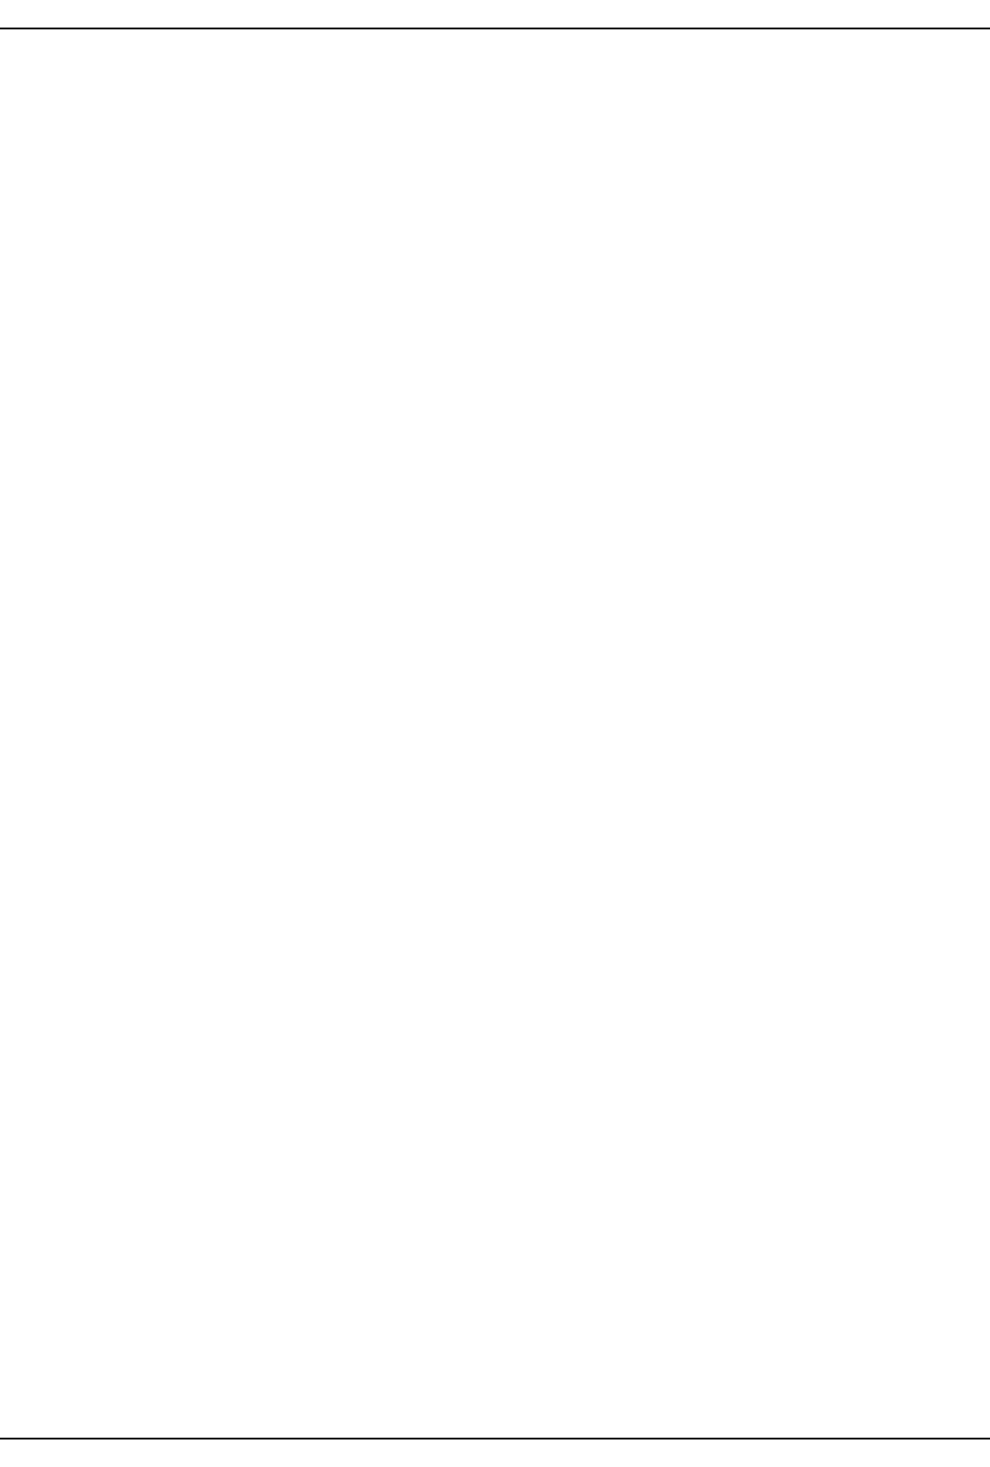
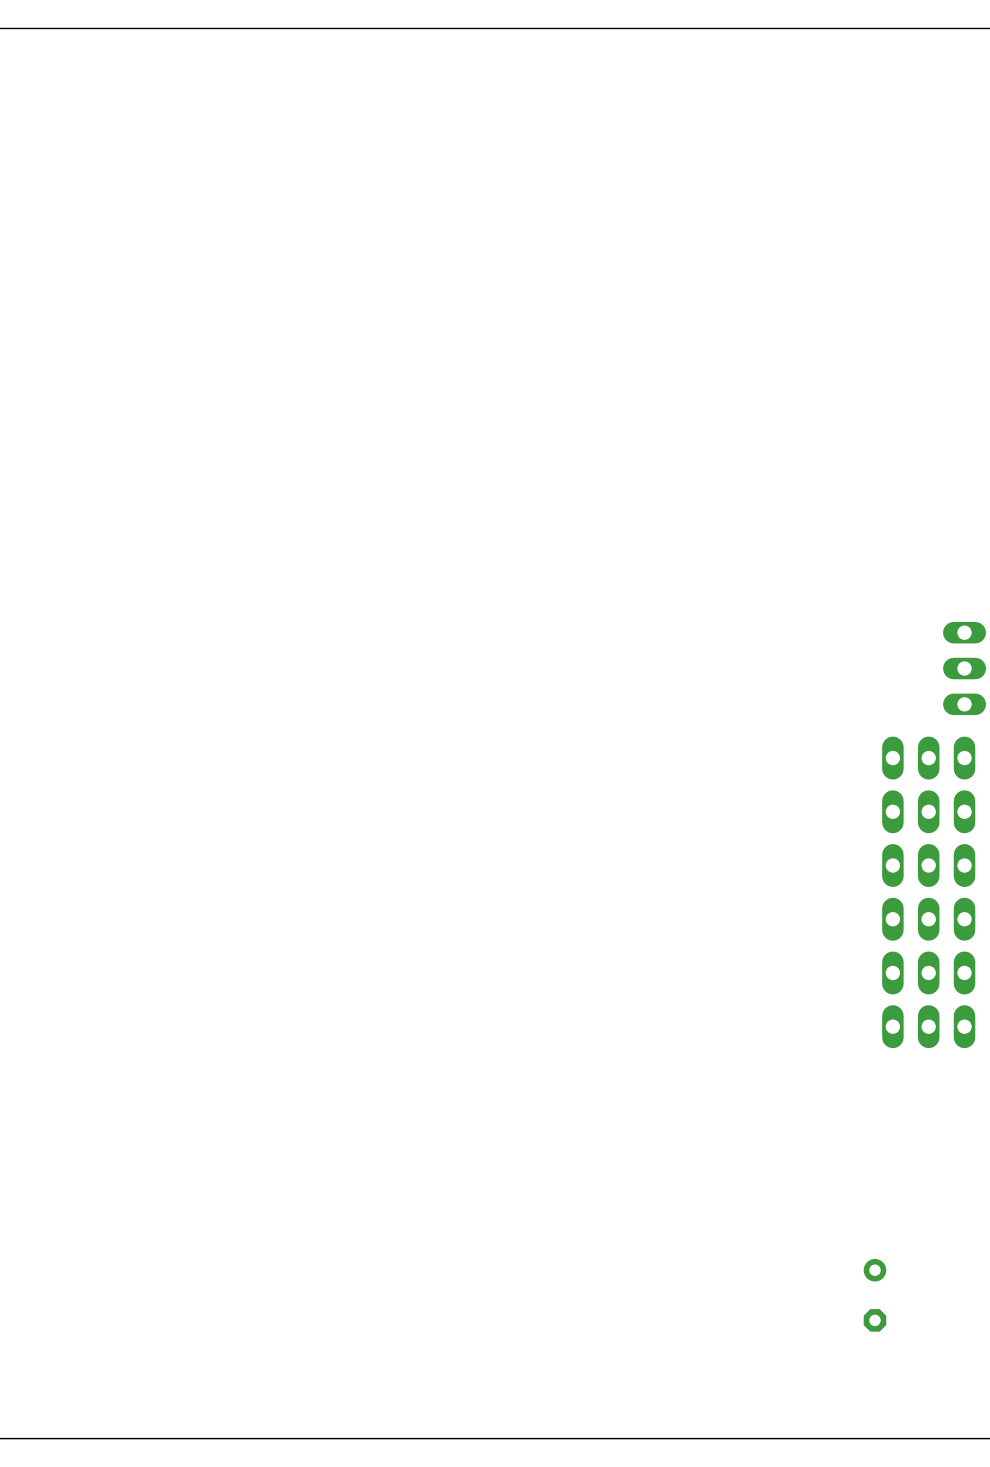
part: none -> (964, 668)
part: none -> (928, 758)
part: none -> (928, 811)
part: none -> (928, 865)
part: none -> (928, 919)
part: none -> (928, 972)
part: none -> (928, 1026)
part: none -> (874, 1295)

